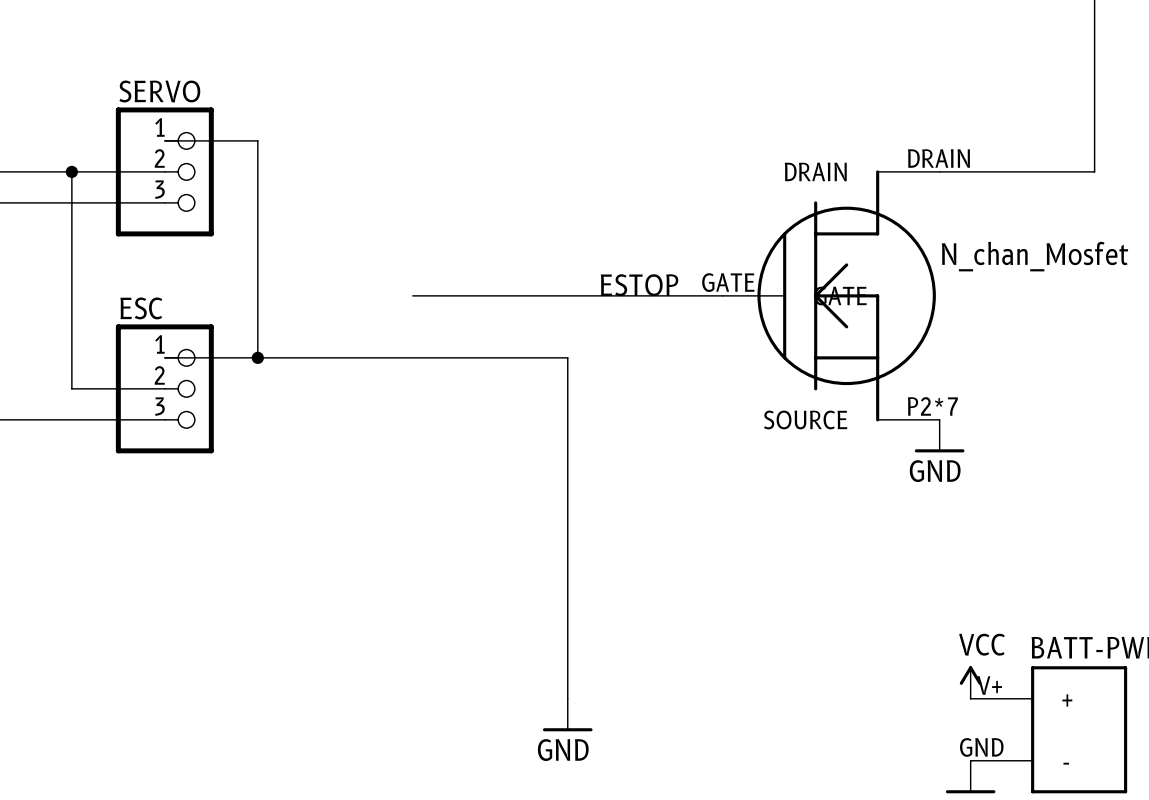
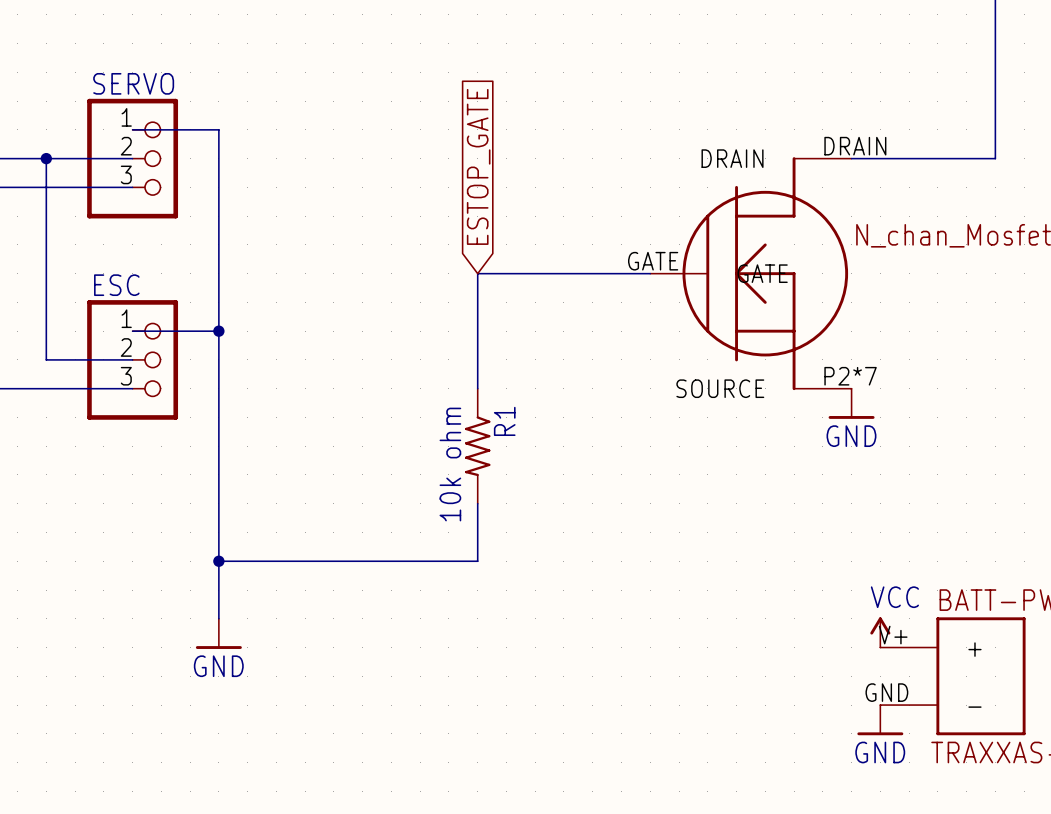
global label: none -> ESTOP_GATE (478, 166)
label: ESTOP (639, 285) -> none
wire: (412, 295) (536, 295) -> (477, 388) (477, 273)
wire: (257, 357) (567, 357) (567, 698) -> (218, 331) (218, 618)
R1: none -> 10k ohm (477, 446)
wire: none -> (477, 503) (477, 561) (218, 561)
junction: none -> (218, 561)
power symbol: none -> GND (218, 633)
power symbol: GND (567, 715) -> none

